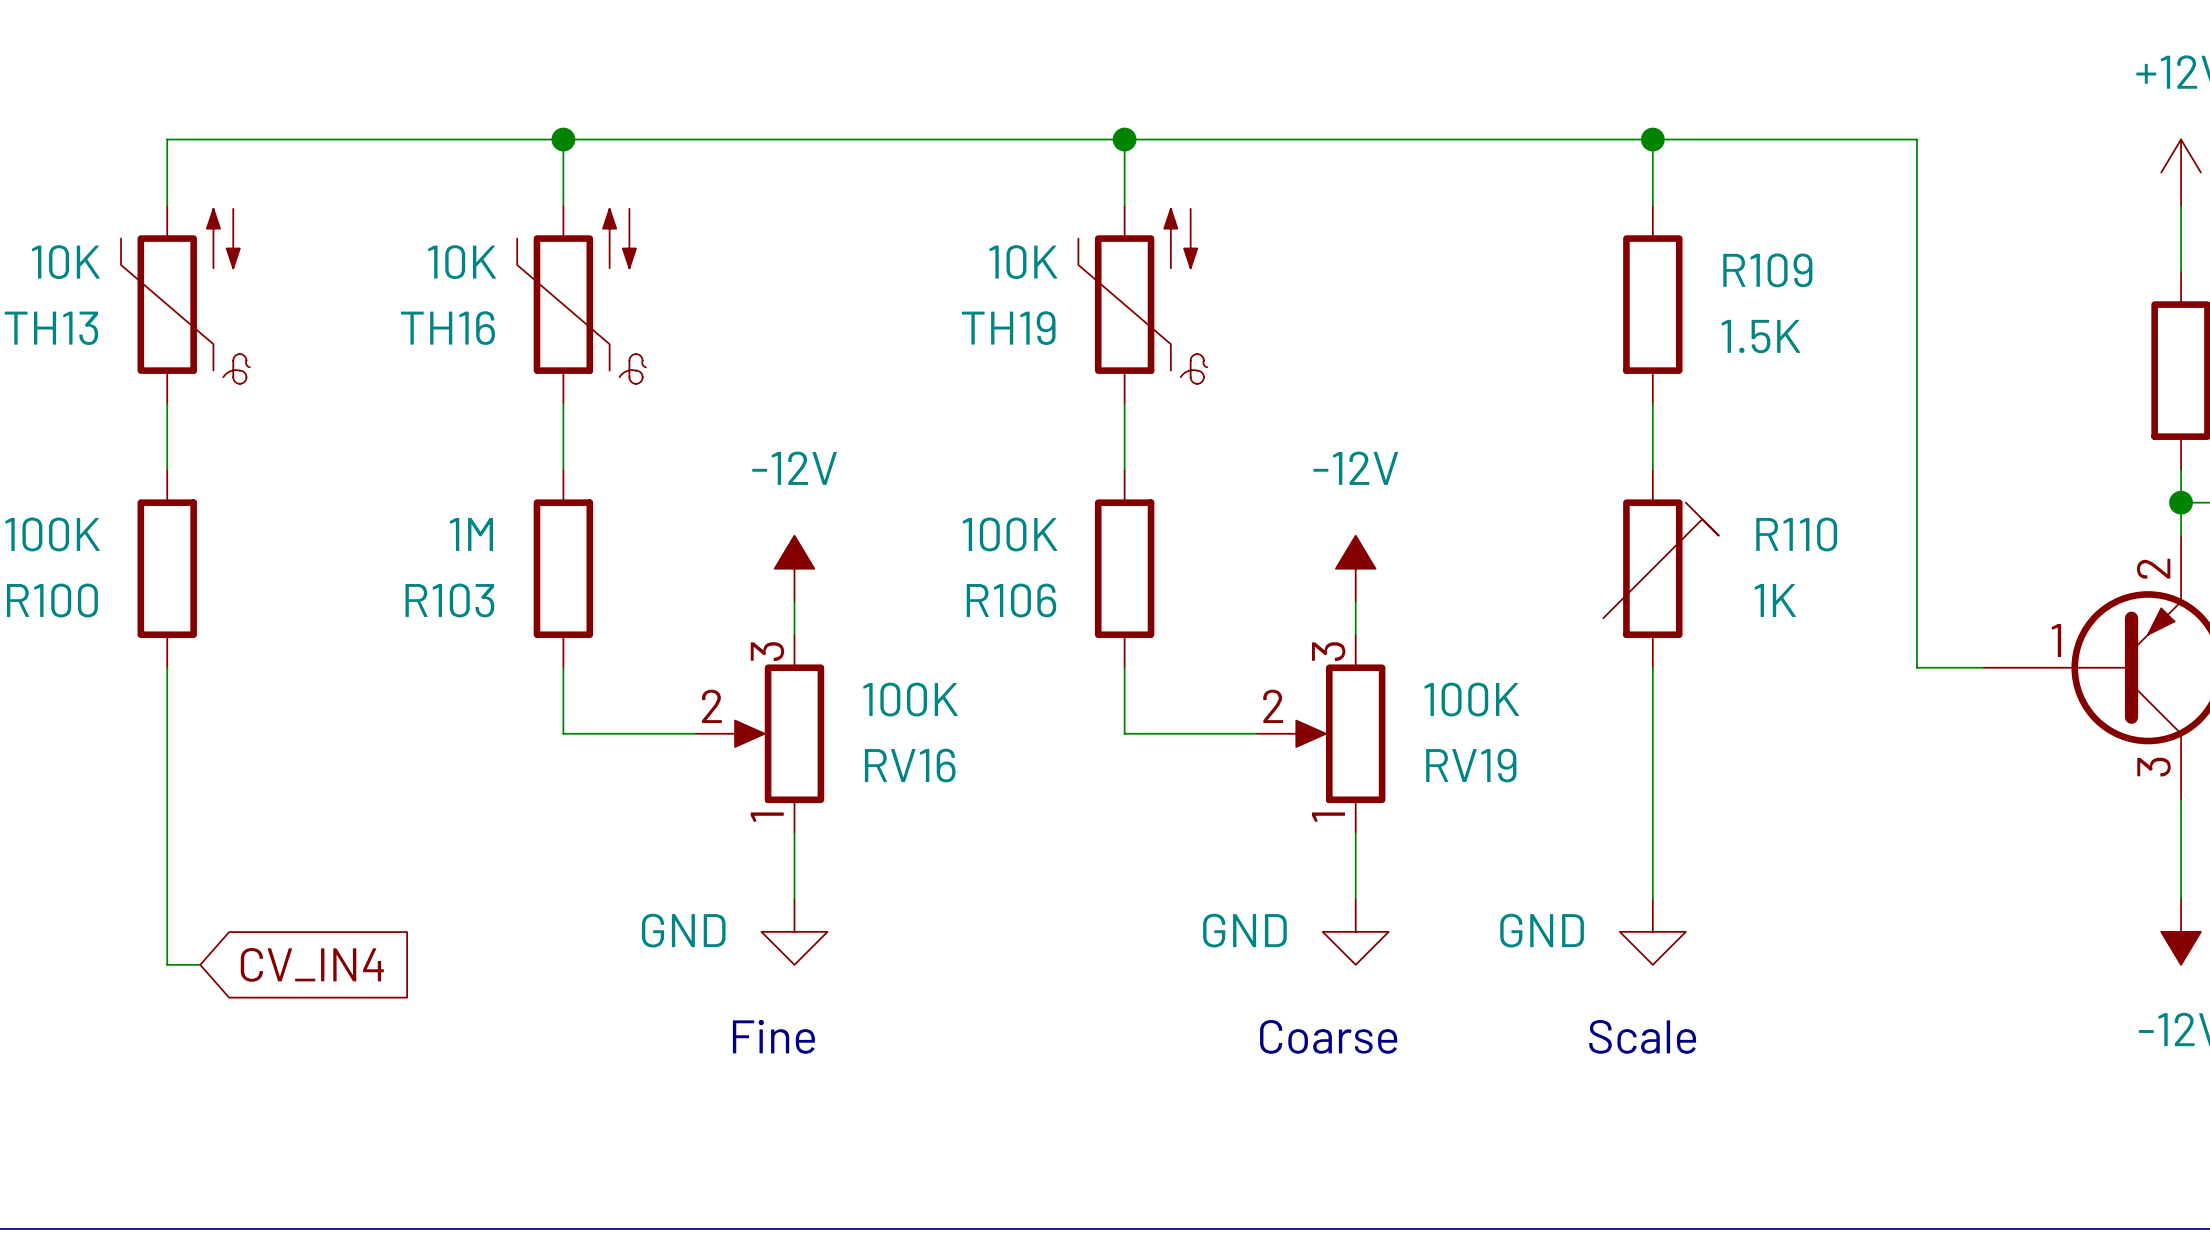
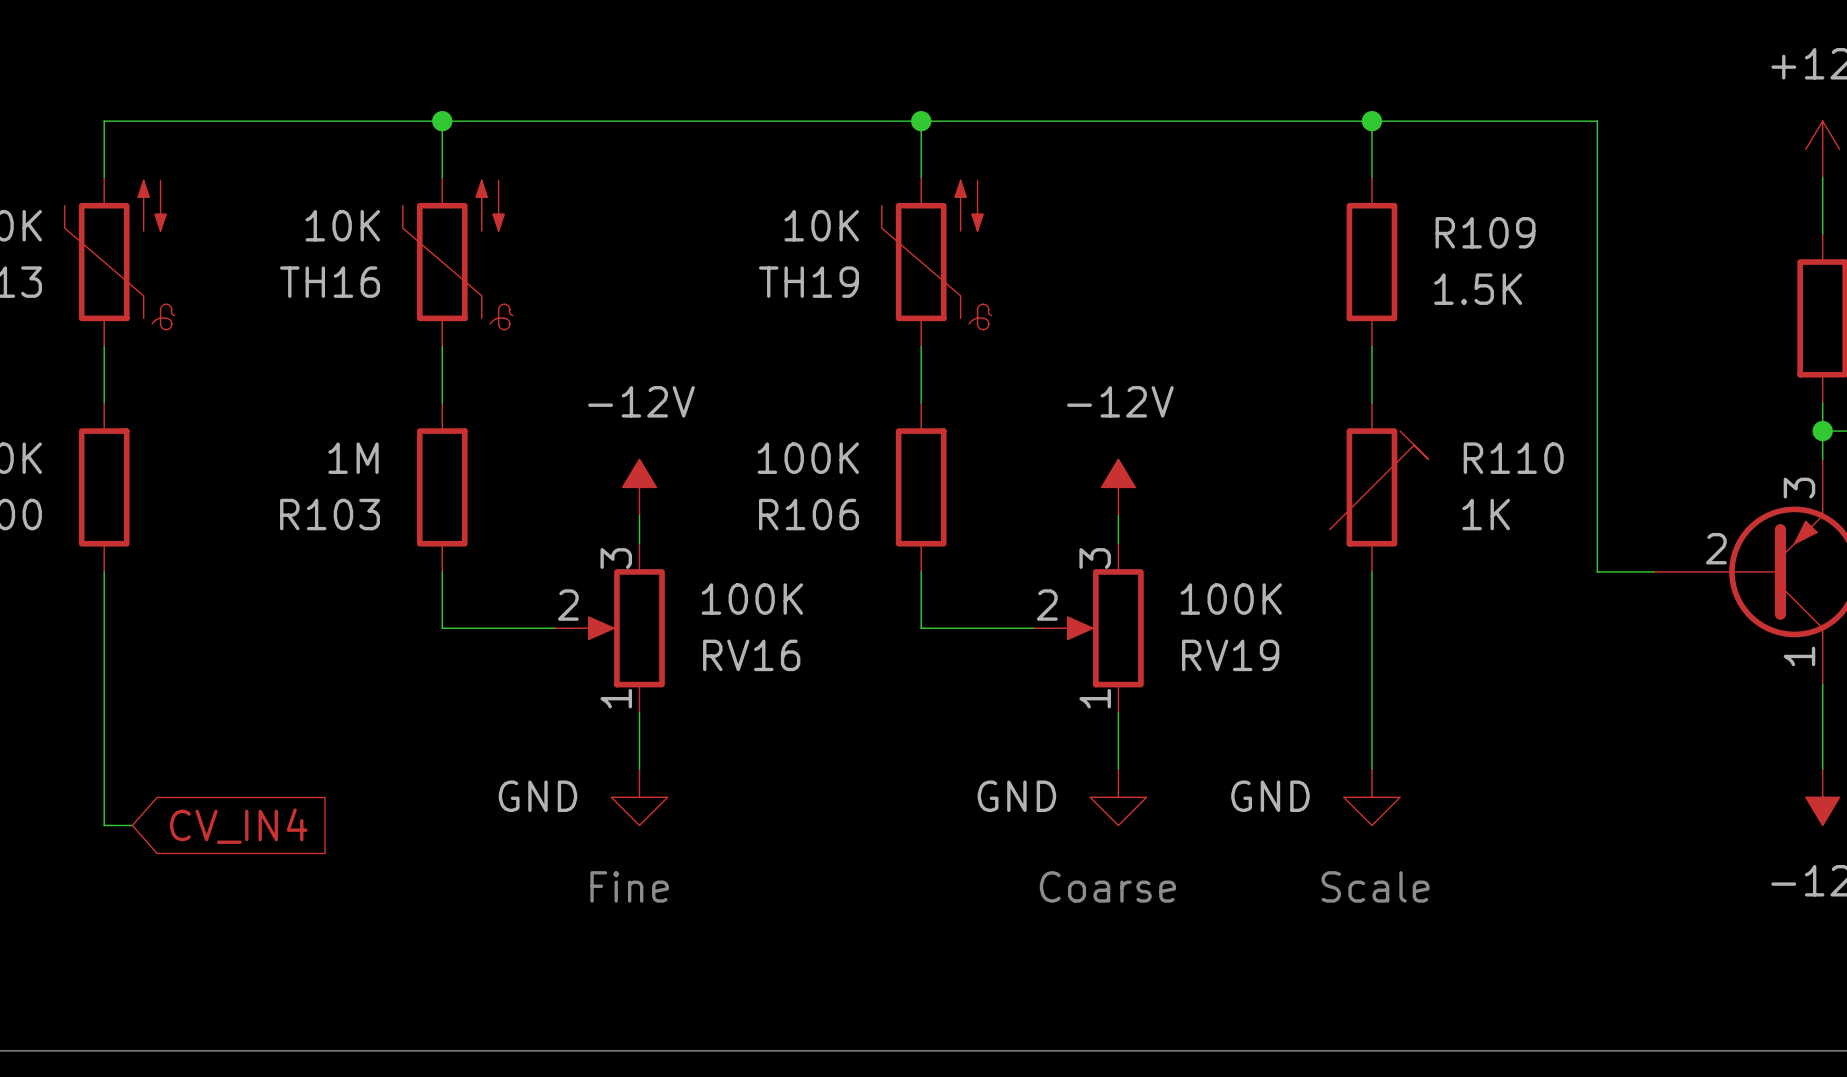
part pin number: 2 (2153, 568) -> 3 (1799, 488)
part pin number: 1 (2056, 640) -> 2 (1716, 548)
part pin number: 3 (2154, 767) -> 1 (1799, 656)

